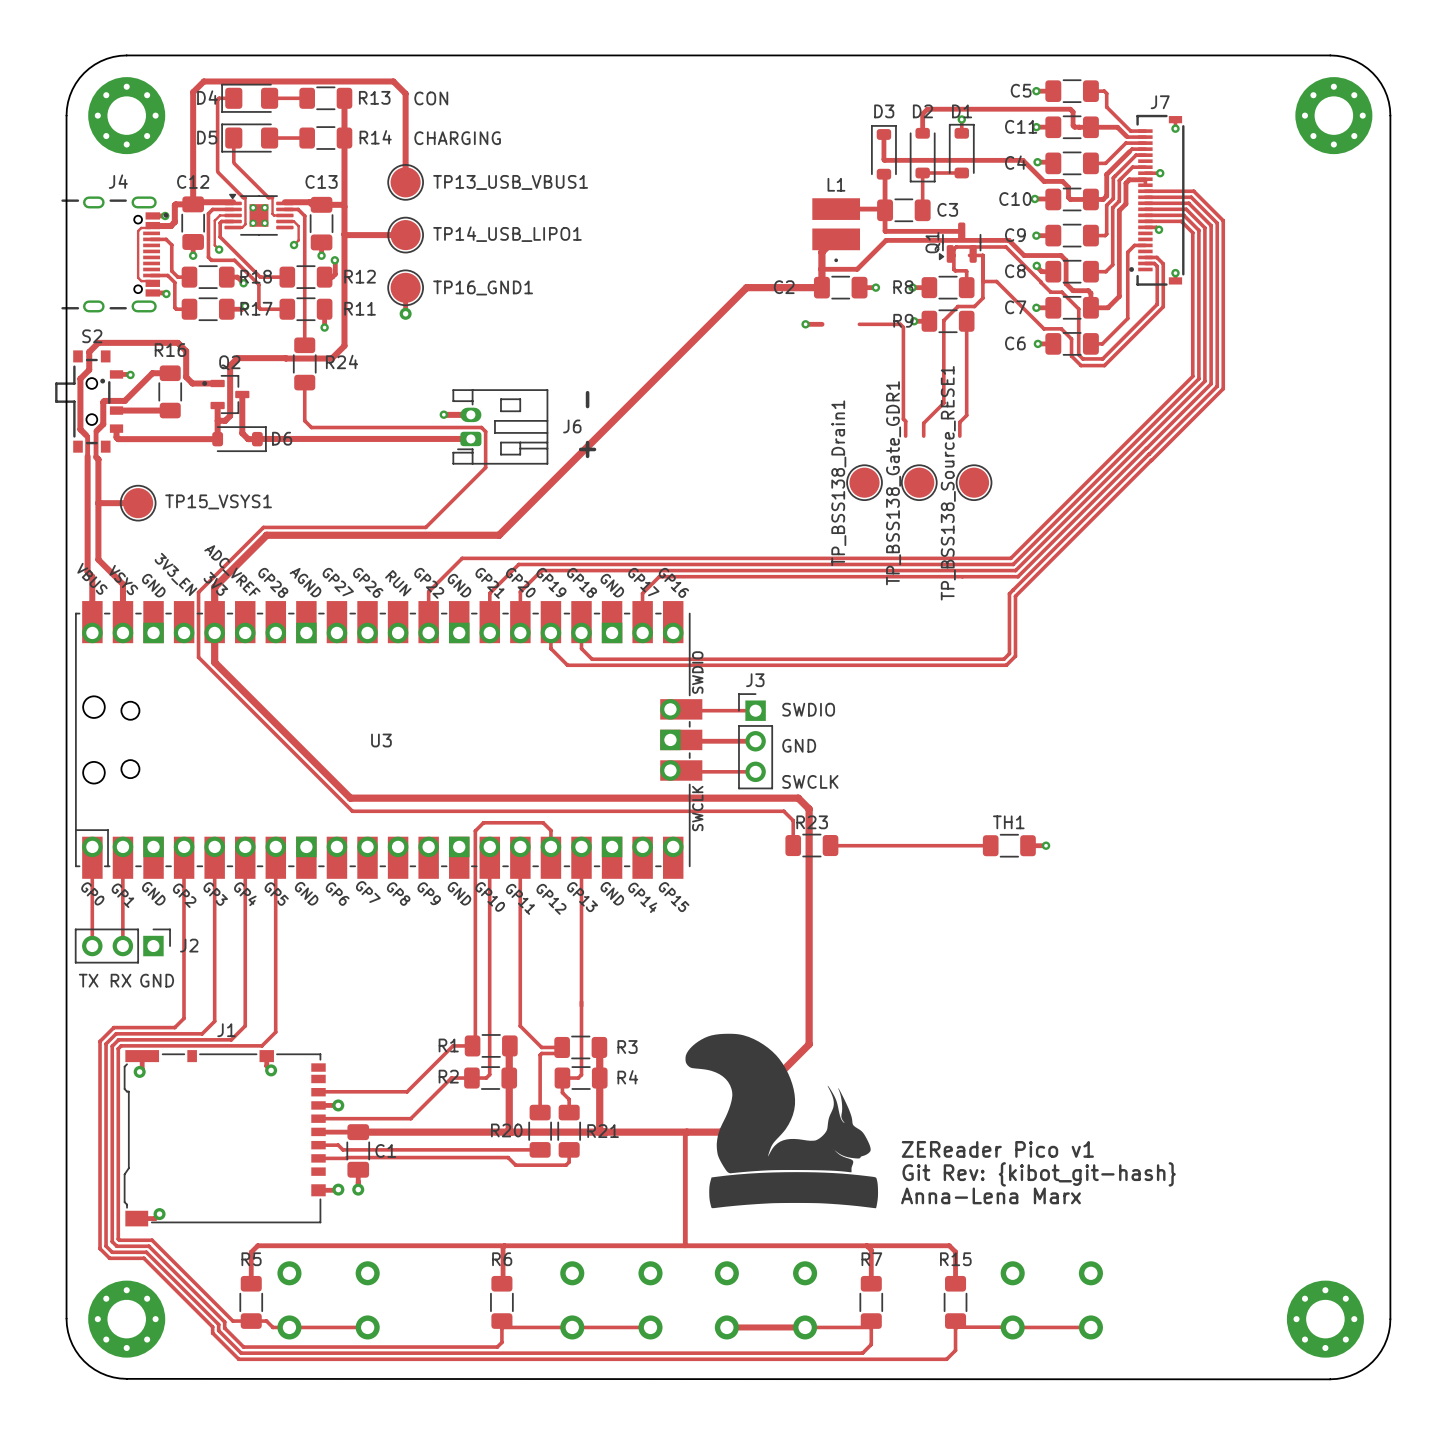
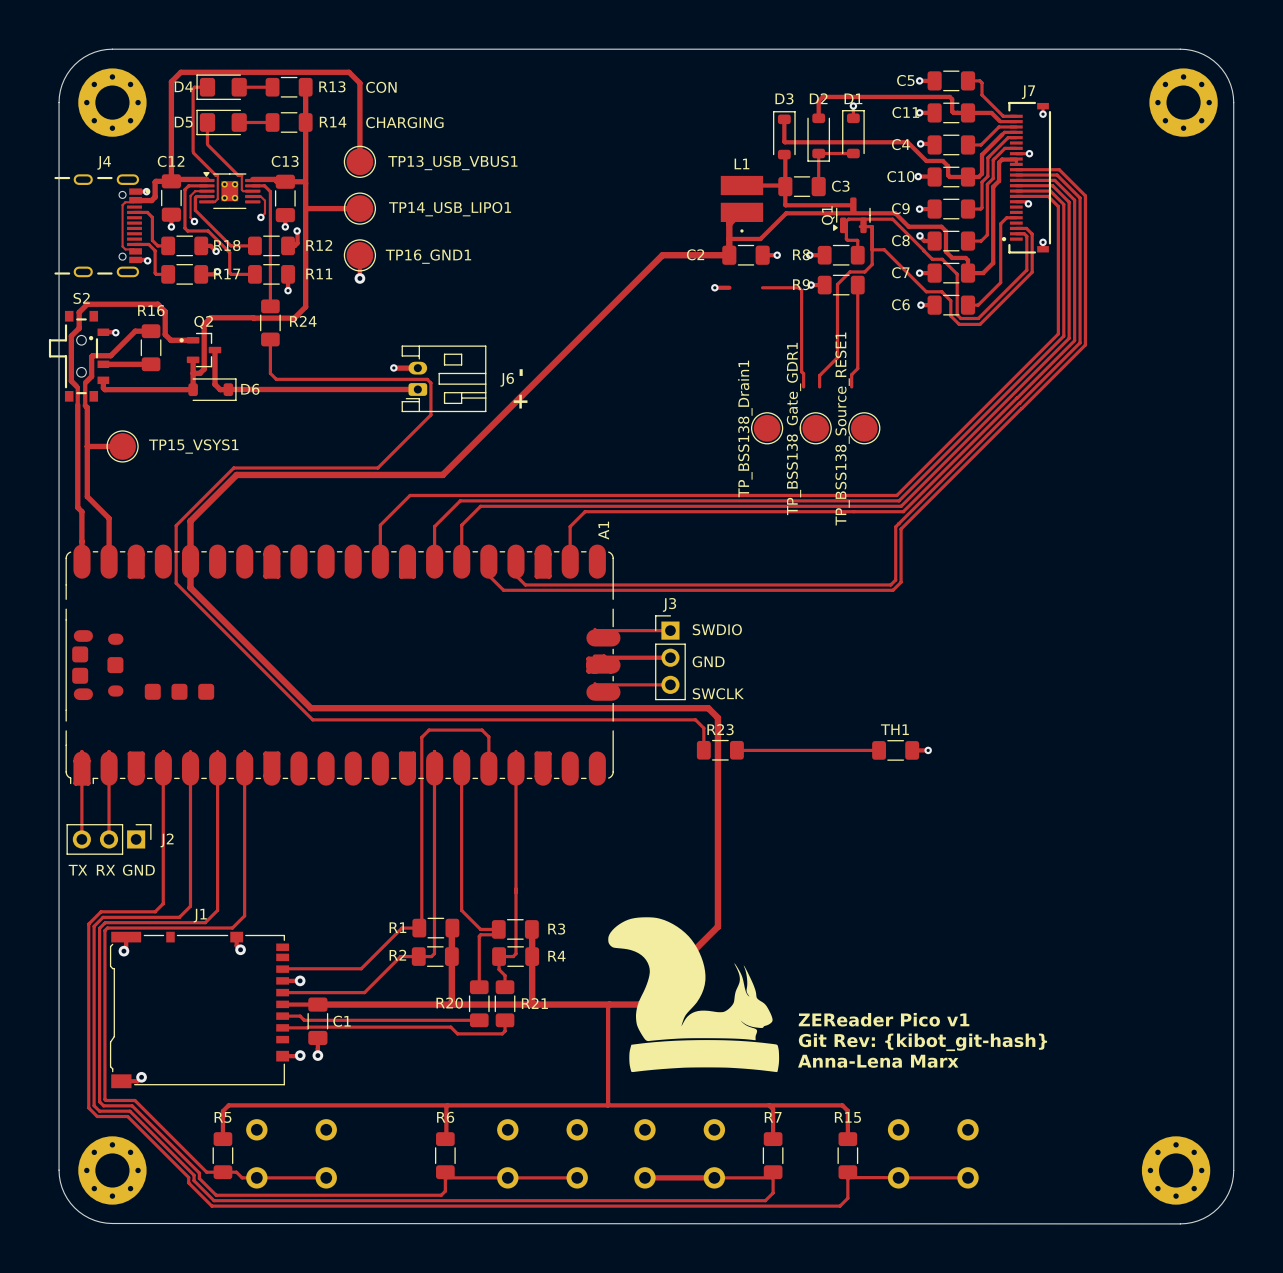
U3: (388, 739) -> none
A1: none -> (343, 665)

